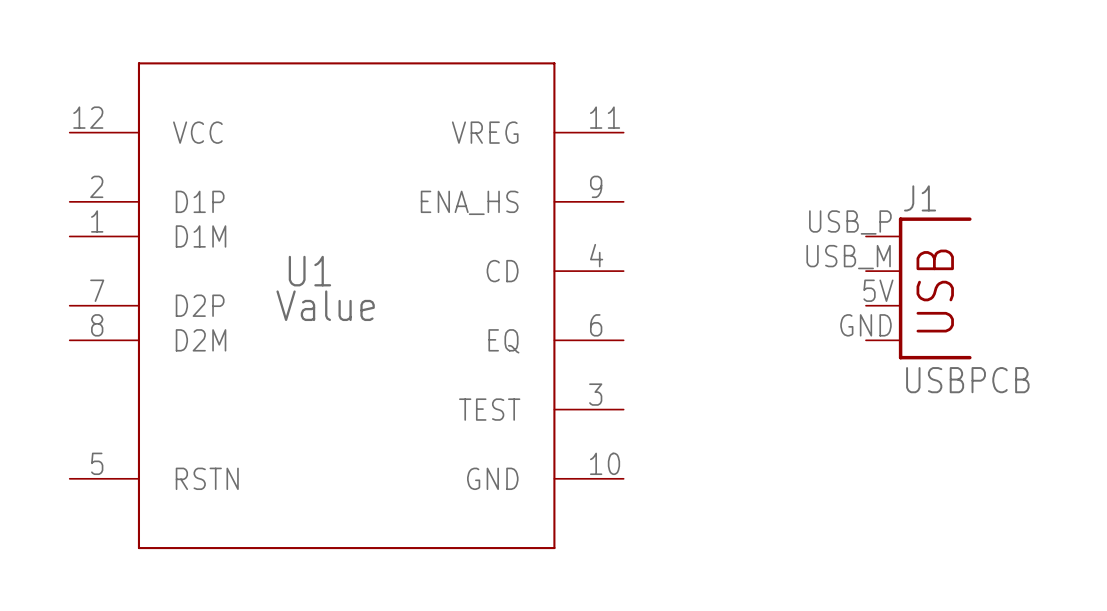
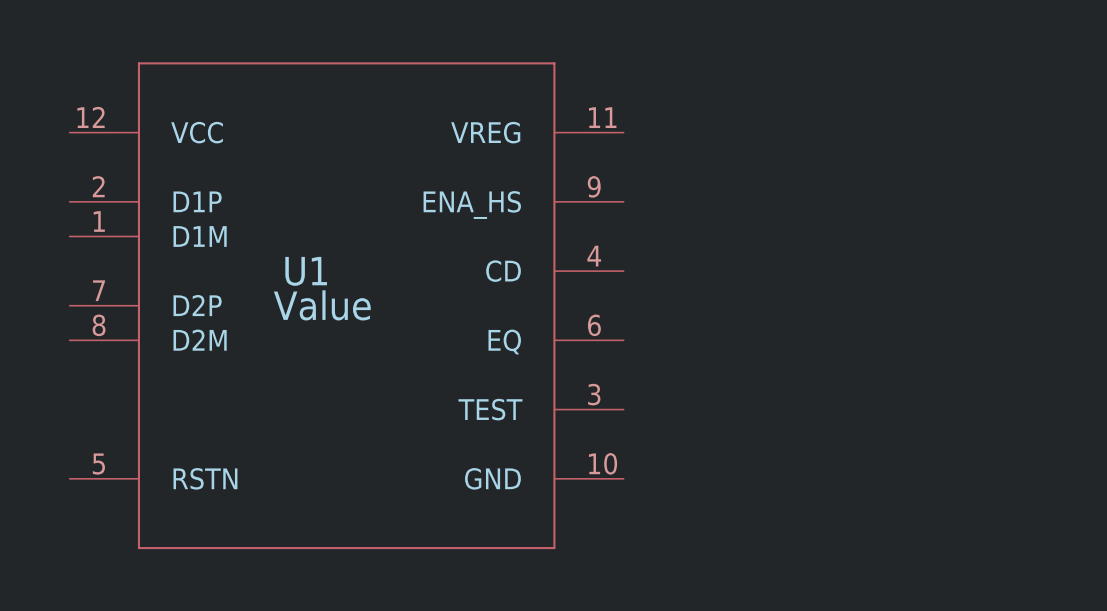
J1: USBPCB (918, 288) -> none

